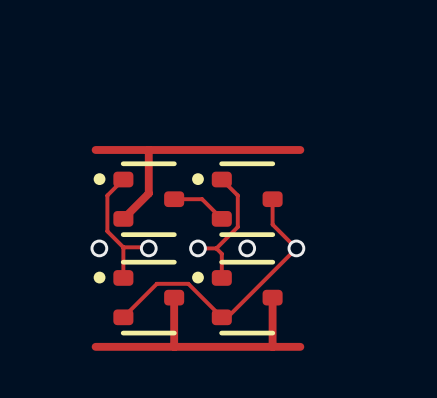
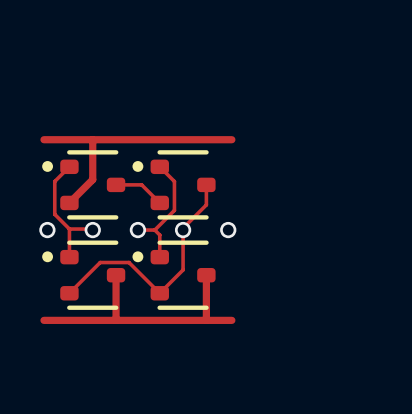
track: (272, 221) (272, 224) (296, 248) (227, 317) (221, 317) -> (206, 204) (183, 228) (183, 269) (159, 293)

